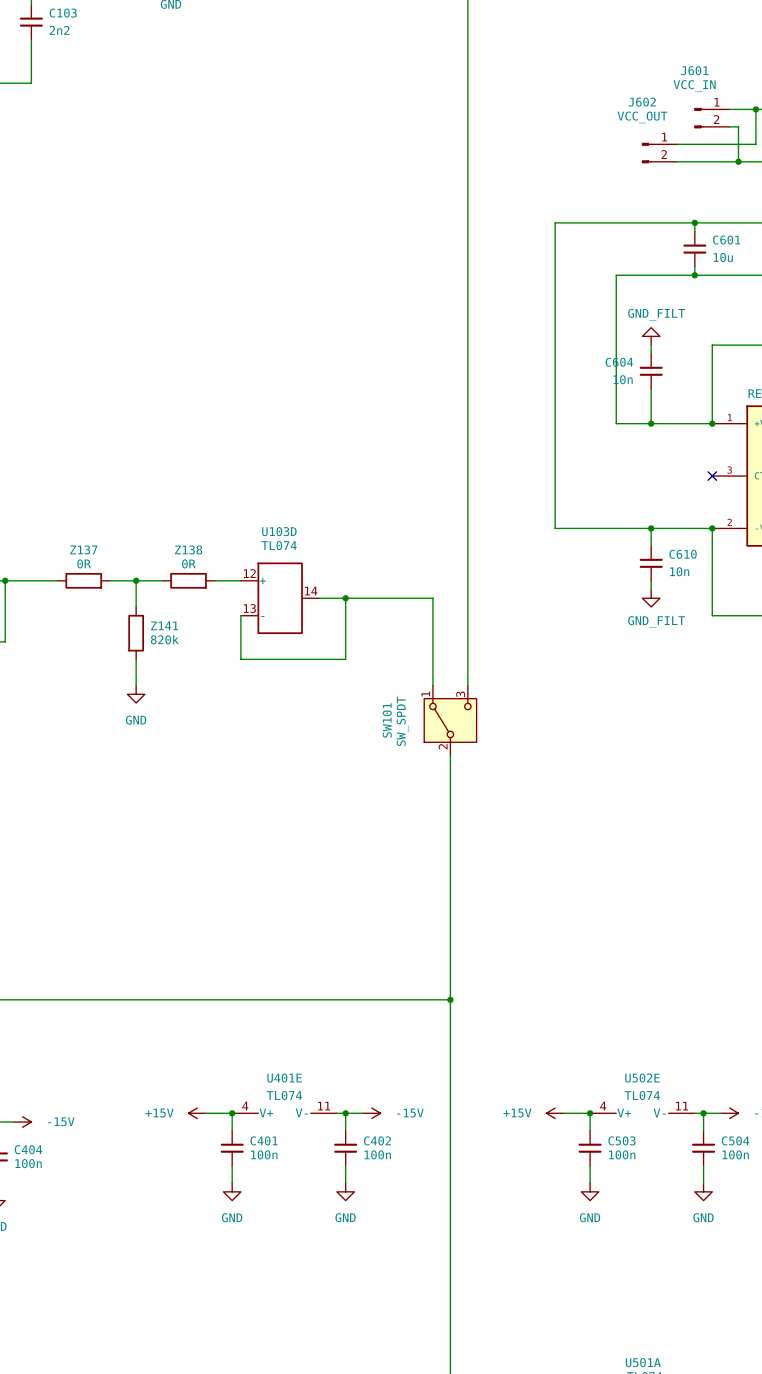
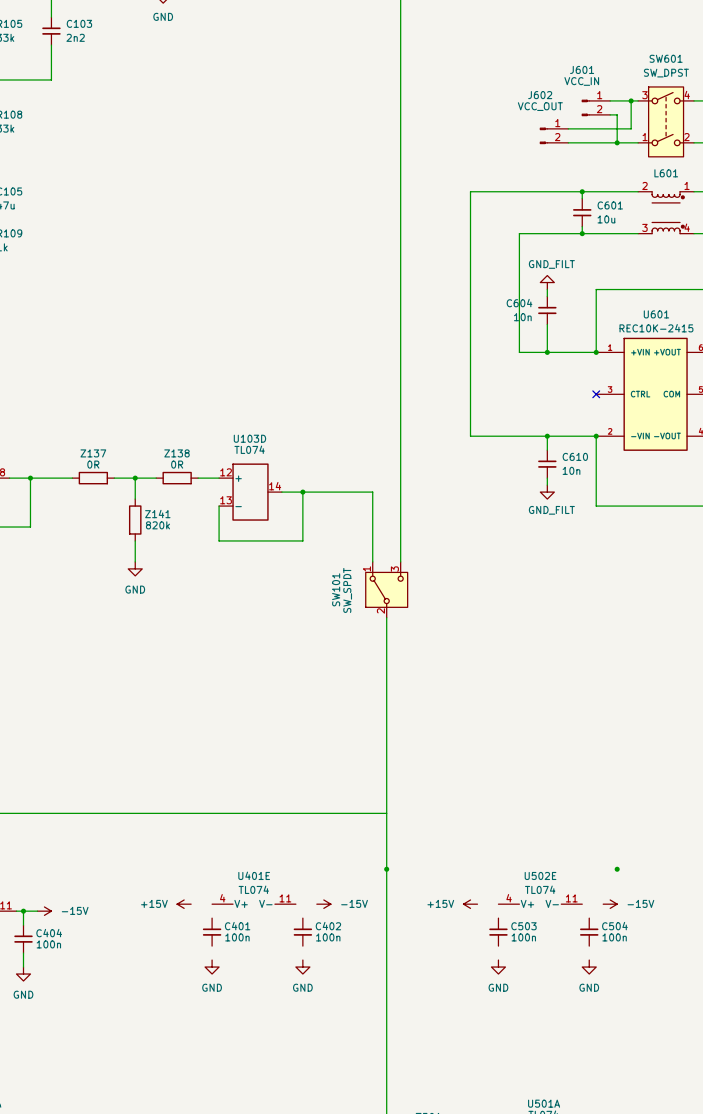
junction: (450, 999) -> none
junction: none -> (386, 869)
junction: none -> (617, 869)
wire: (205, 1113) (232, 1113) (232, 1130) -> none
junction: (232, 1113) -> none
wire: (336, 1113) (363, 1113) -> none
wire: (345, 1113) (345, 1130) -> none
junction: (345, 1113) -> none
wire: (563, 1113) (590, 1113) (590, 1130) -> none
junction: (590, 1113) -> none
wire: (694, 1113) (721, 1113) -> none
wire: (703, 1113) (703, 1130) -> none
junction: (703, 1113) -> none
wire: (232, 1165) (232, 1183) -> none
wire: (345, 1165) (345, 1183) -> none
wire: (590, 1165) (590, 1183) -> none
wire: (703, 1165) (703, 1183) -> none

